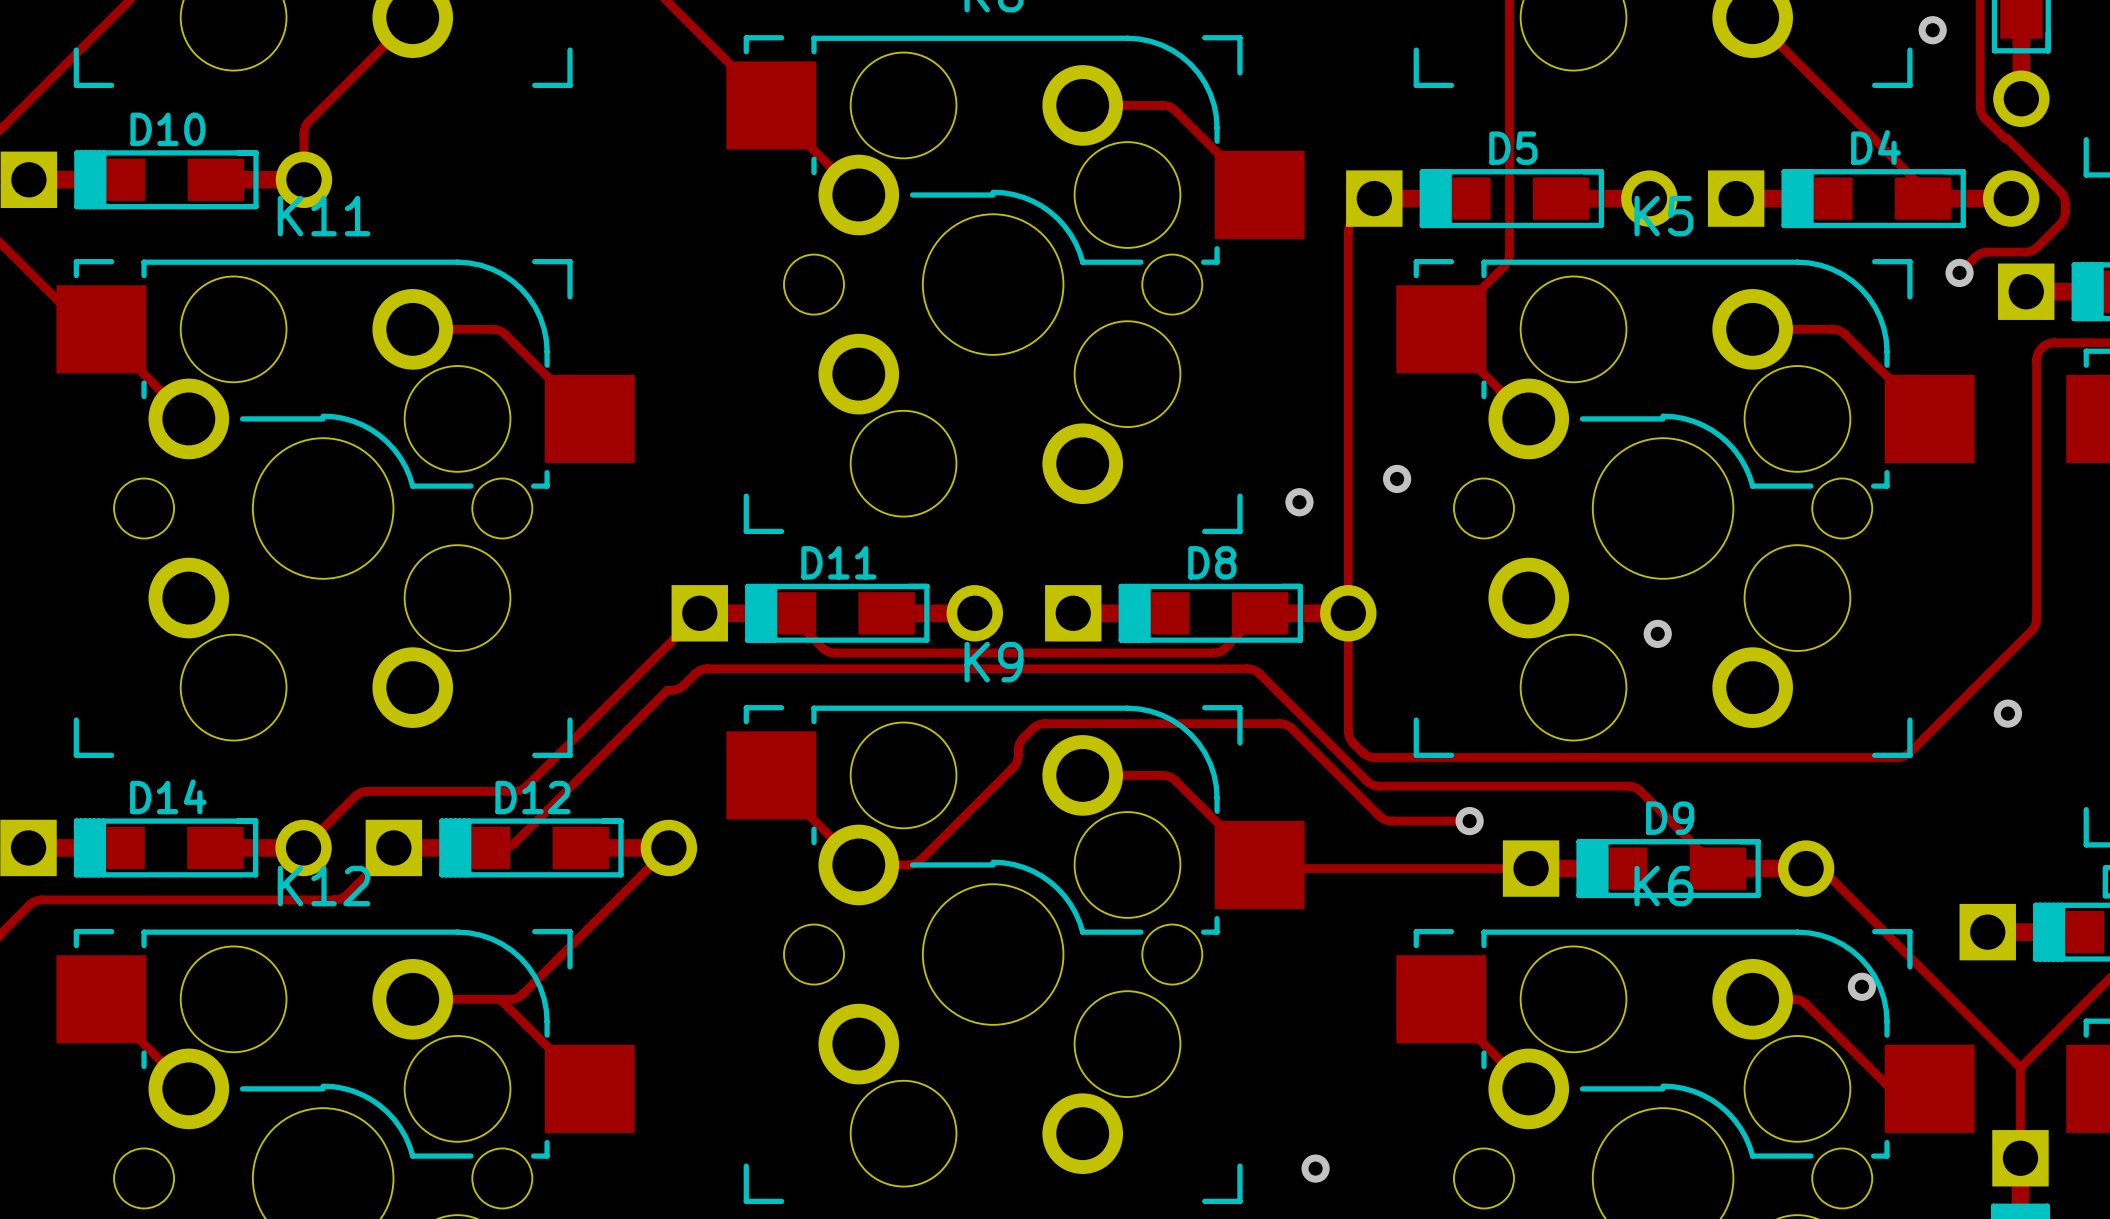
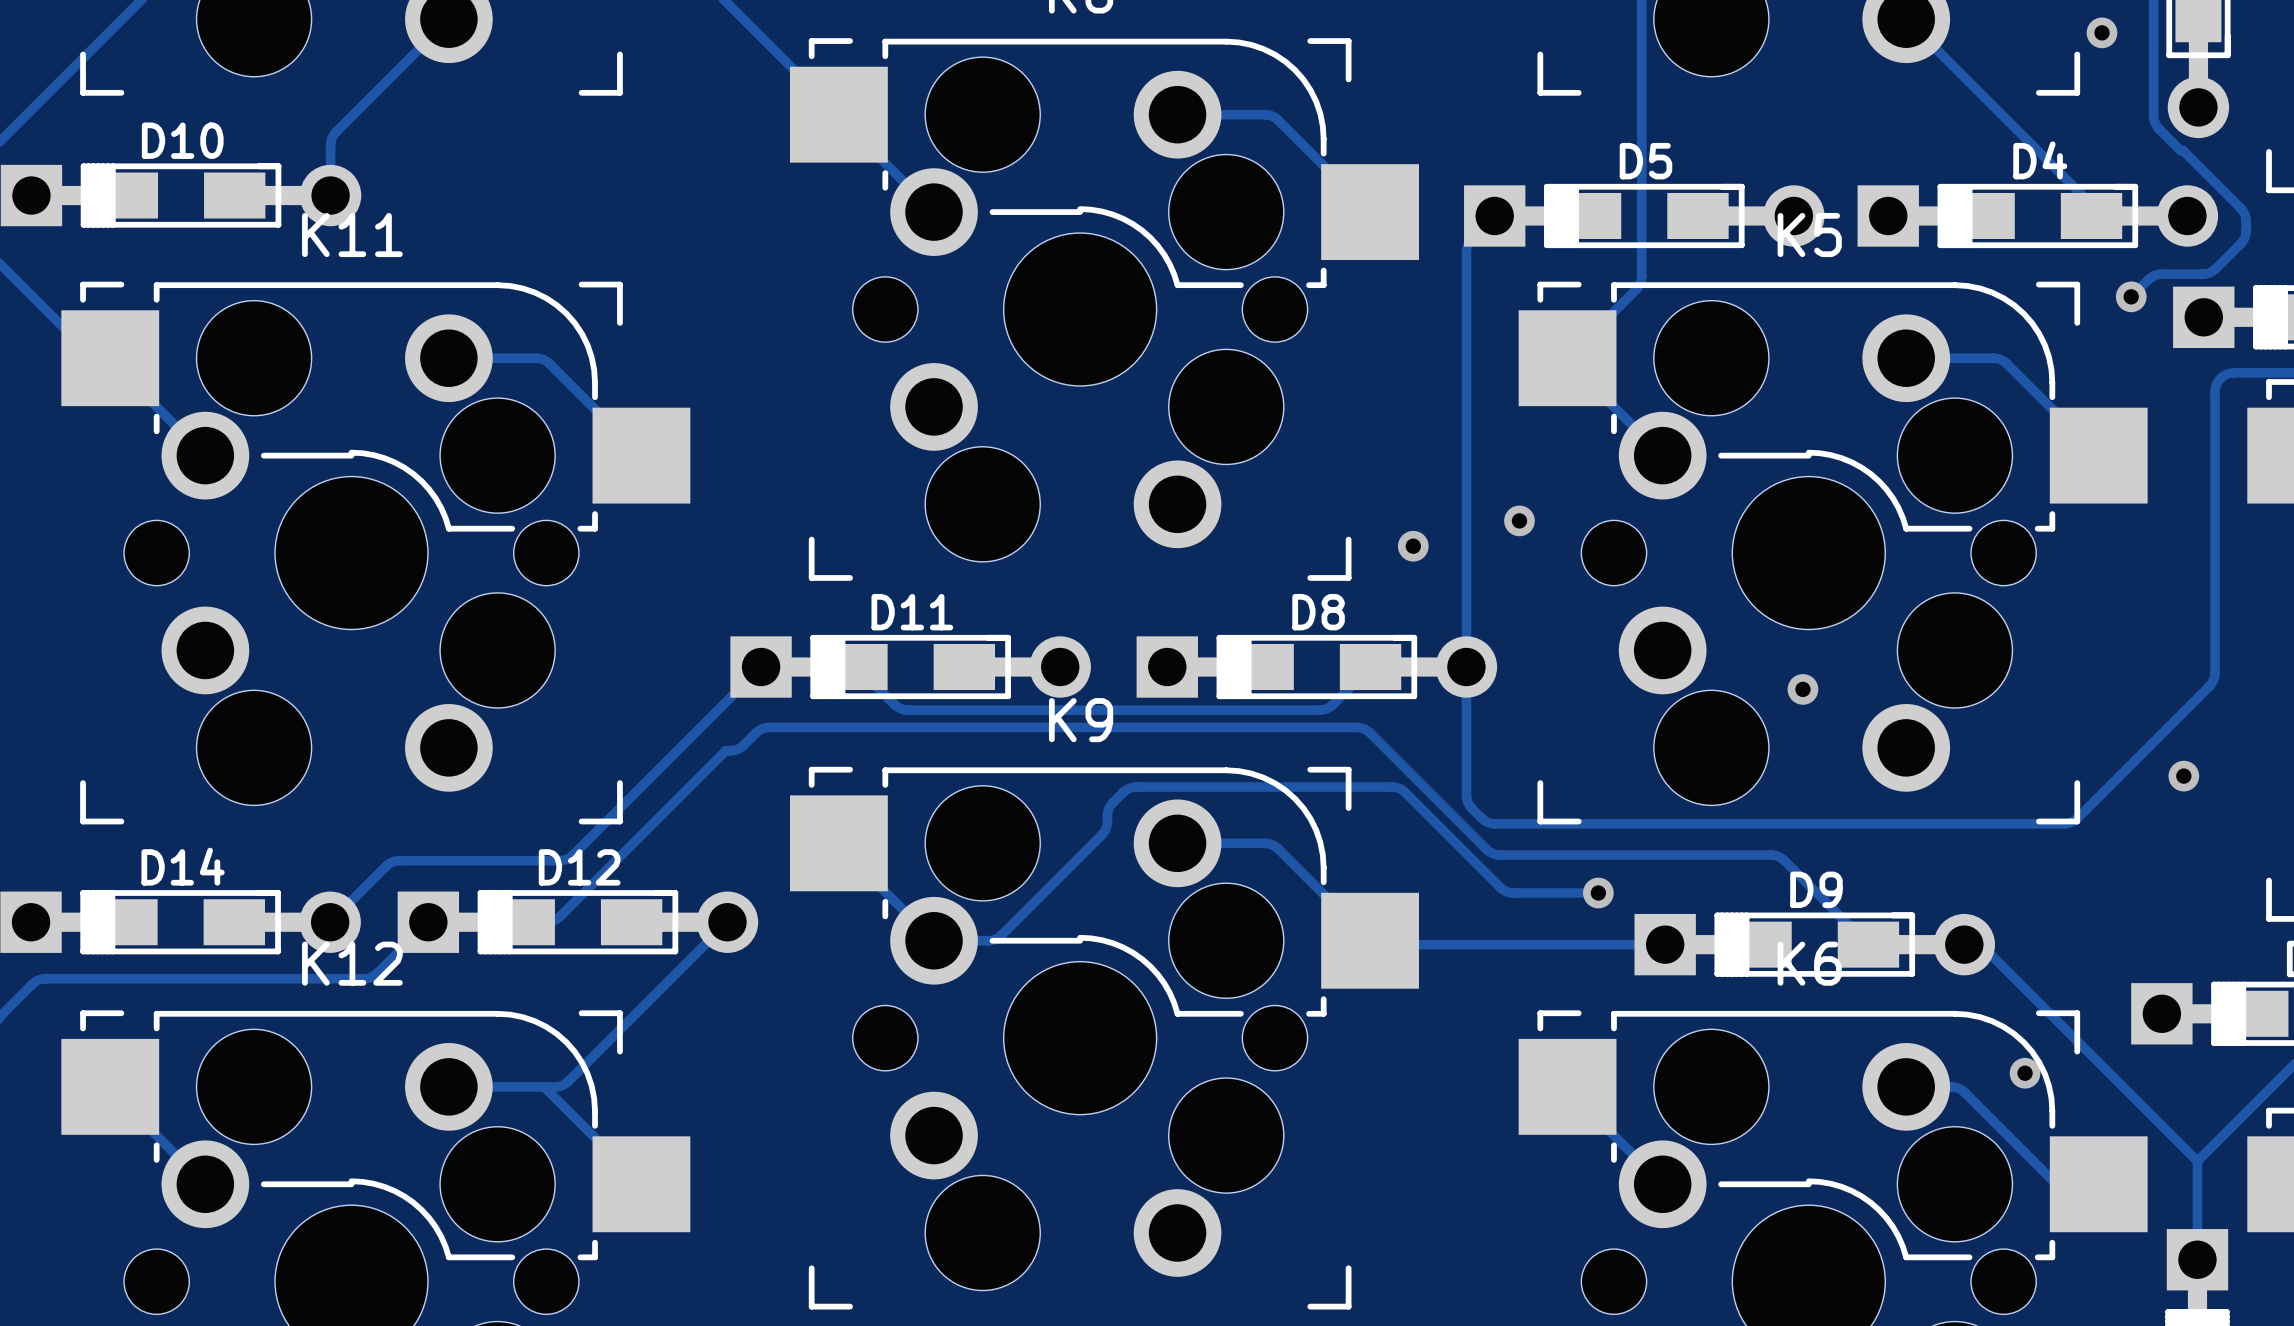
via: (1315, 1168) -> none

